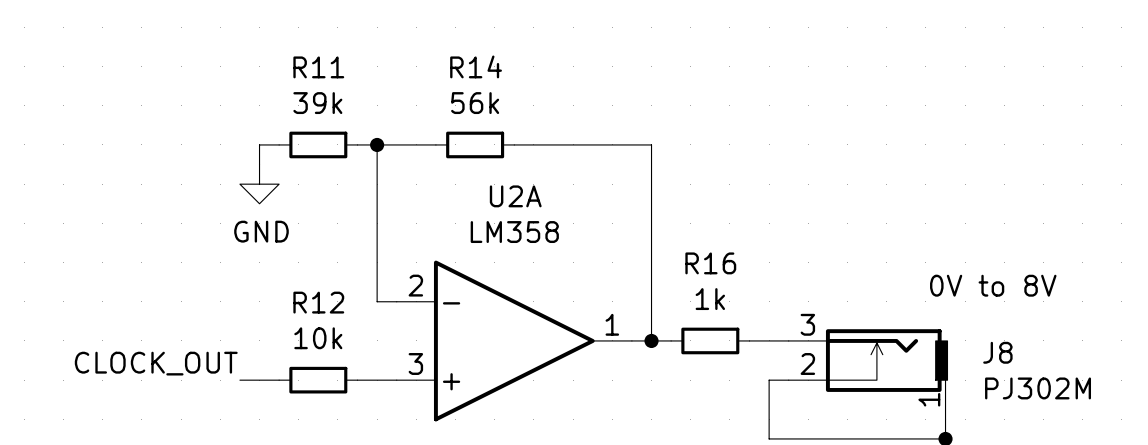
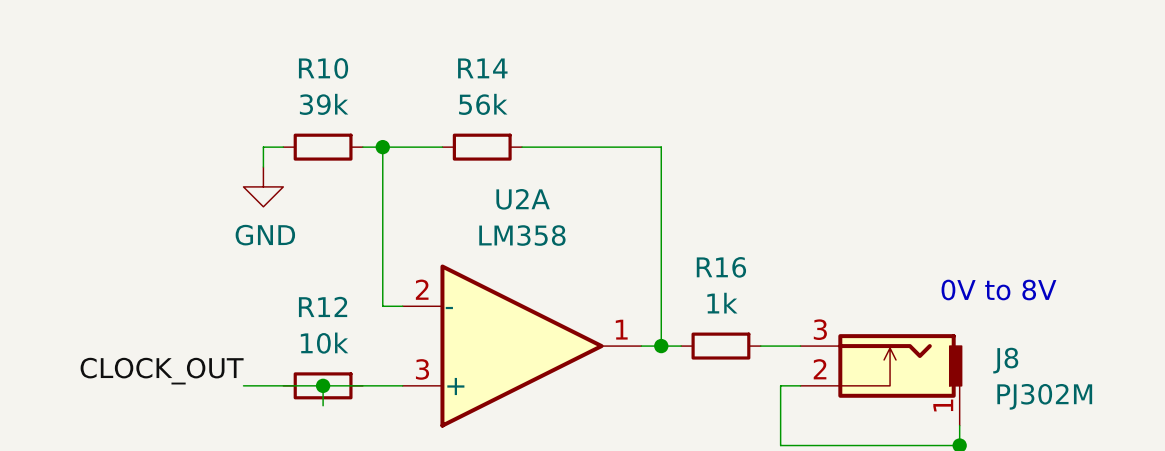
R11 name: R11 (318, 67) -> R10 (323, 68)
wire: none -> (283, 385) (362, 385)
wire: none -> (323, 385) (323, 405)
junction: none -> (323, 385)

